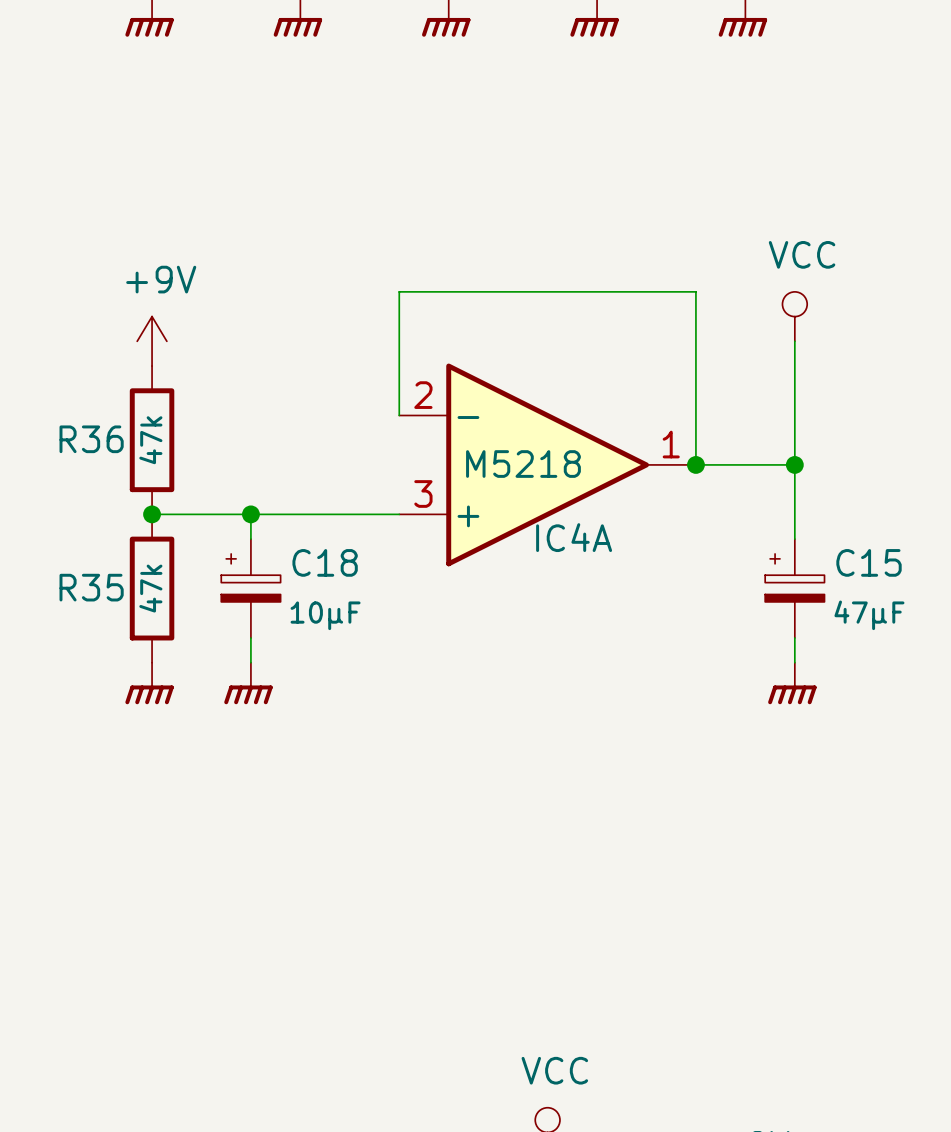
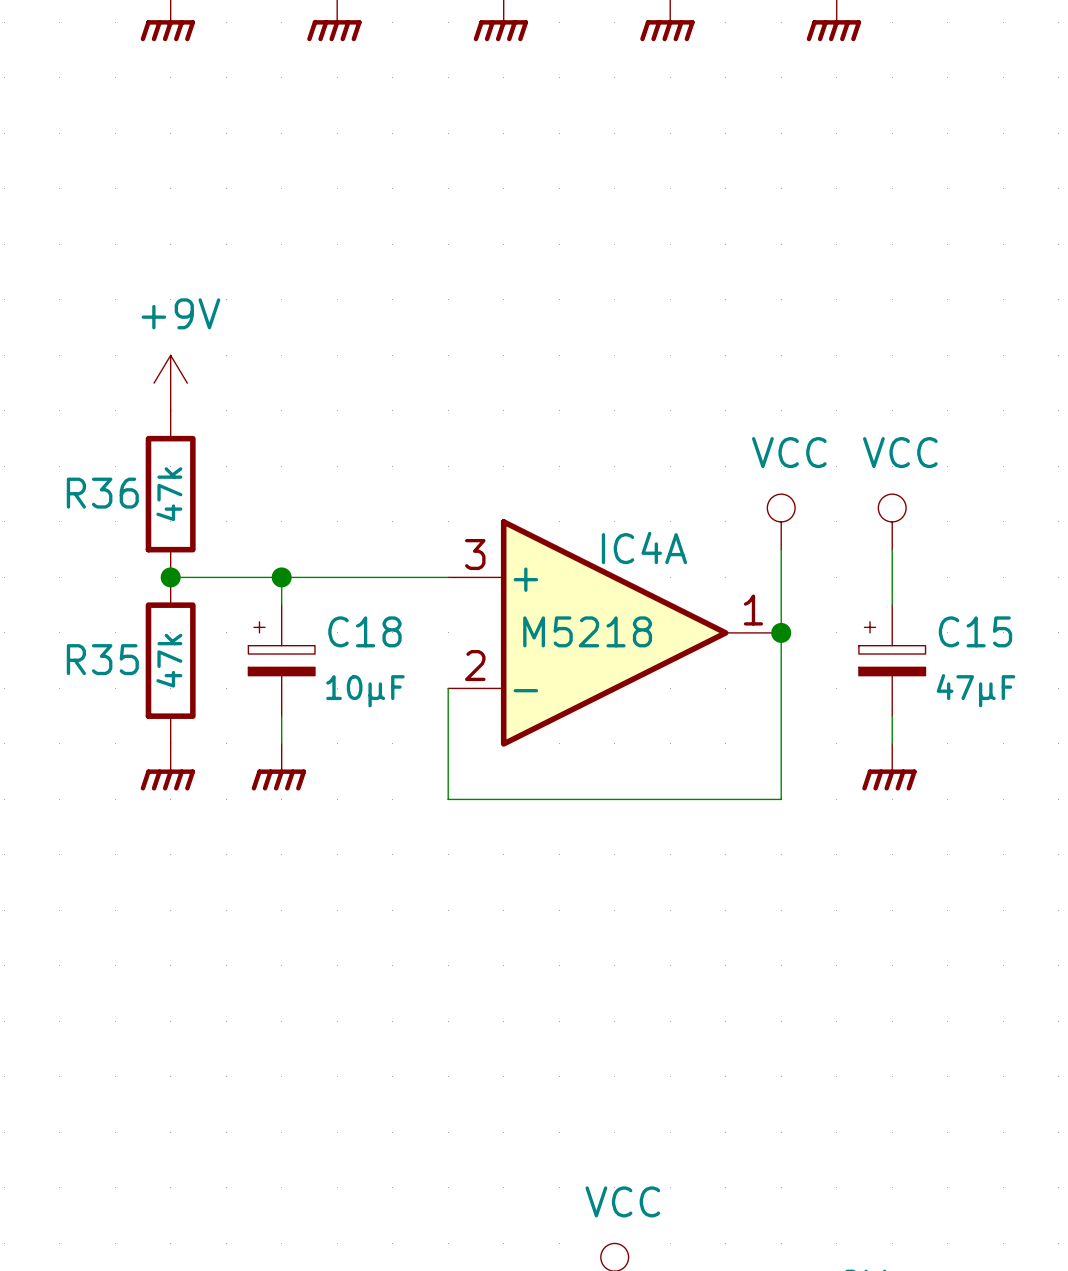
power symbol: VCC (794, 316) -> none
wire: (794, 341) (794, 489) -> none
wire: (399, 415) (399, 291) (695, 291) (695, 464) (794, 464) -> none
IC4A flip: as is (547, 464) -> up-down (614, 632)
power symbol: none -> VCC (781, 521)
junction: (695, 464) -> none
power symbol: none -> VCC (892, 521)
junction: (794, 464) -> none
wire: none -> (781, 549) (781, 799) (448, 799) (448, 688)
junction: none -> (781, 632)

